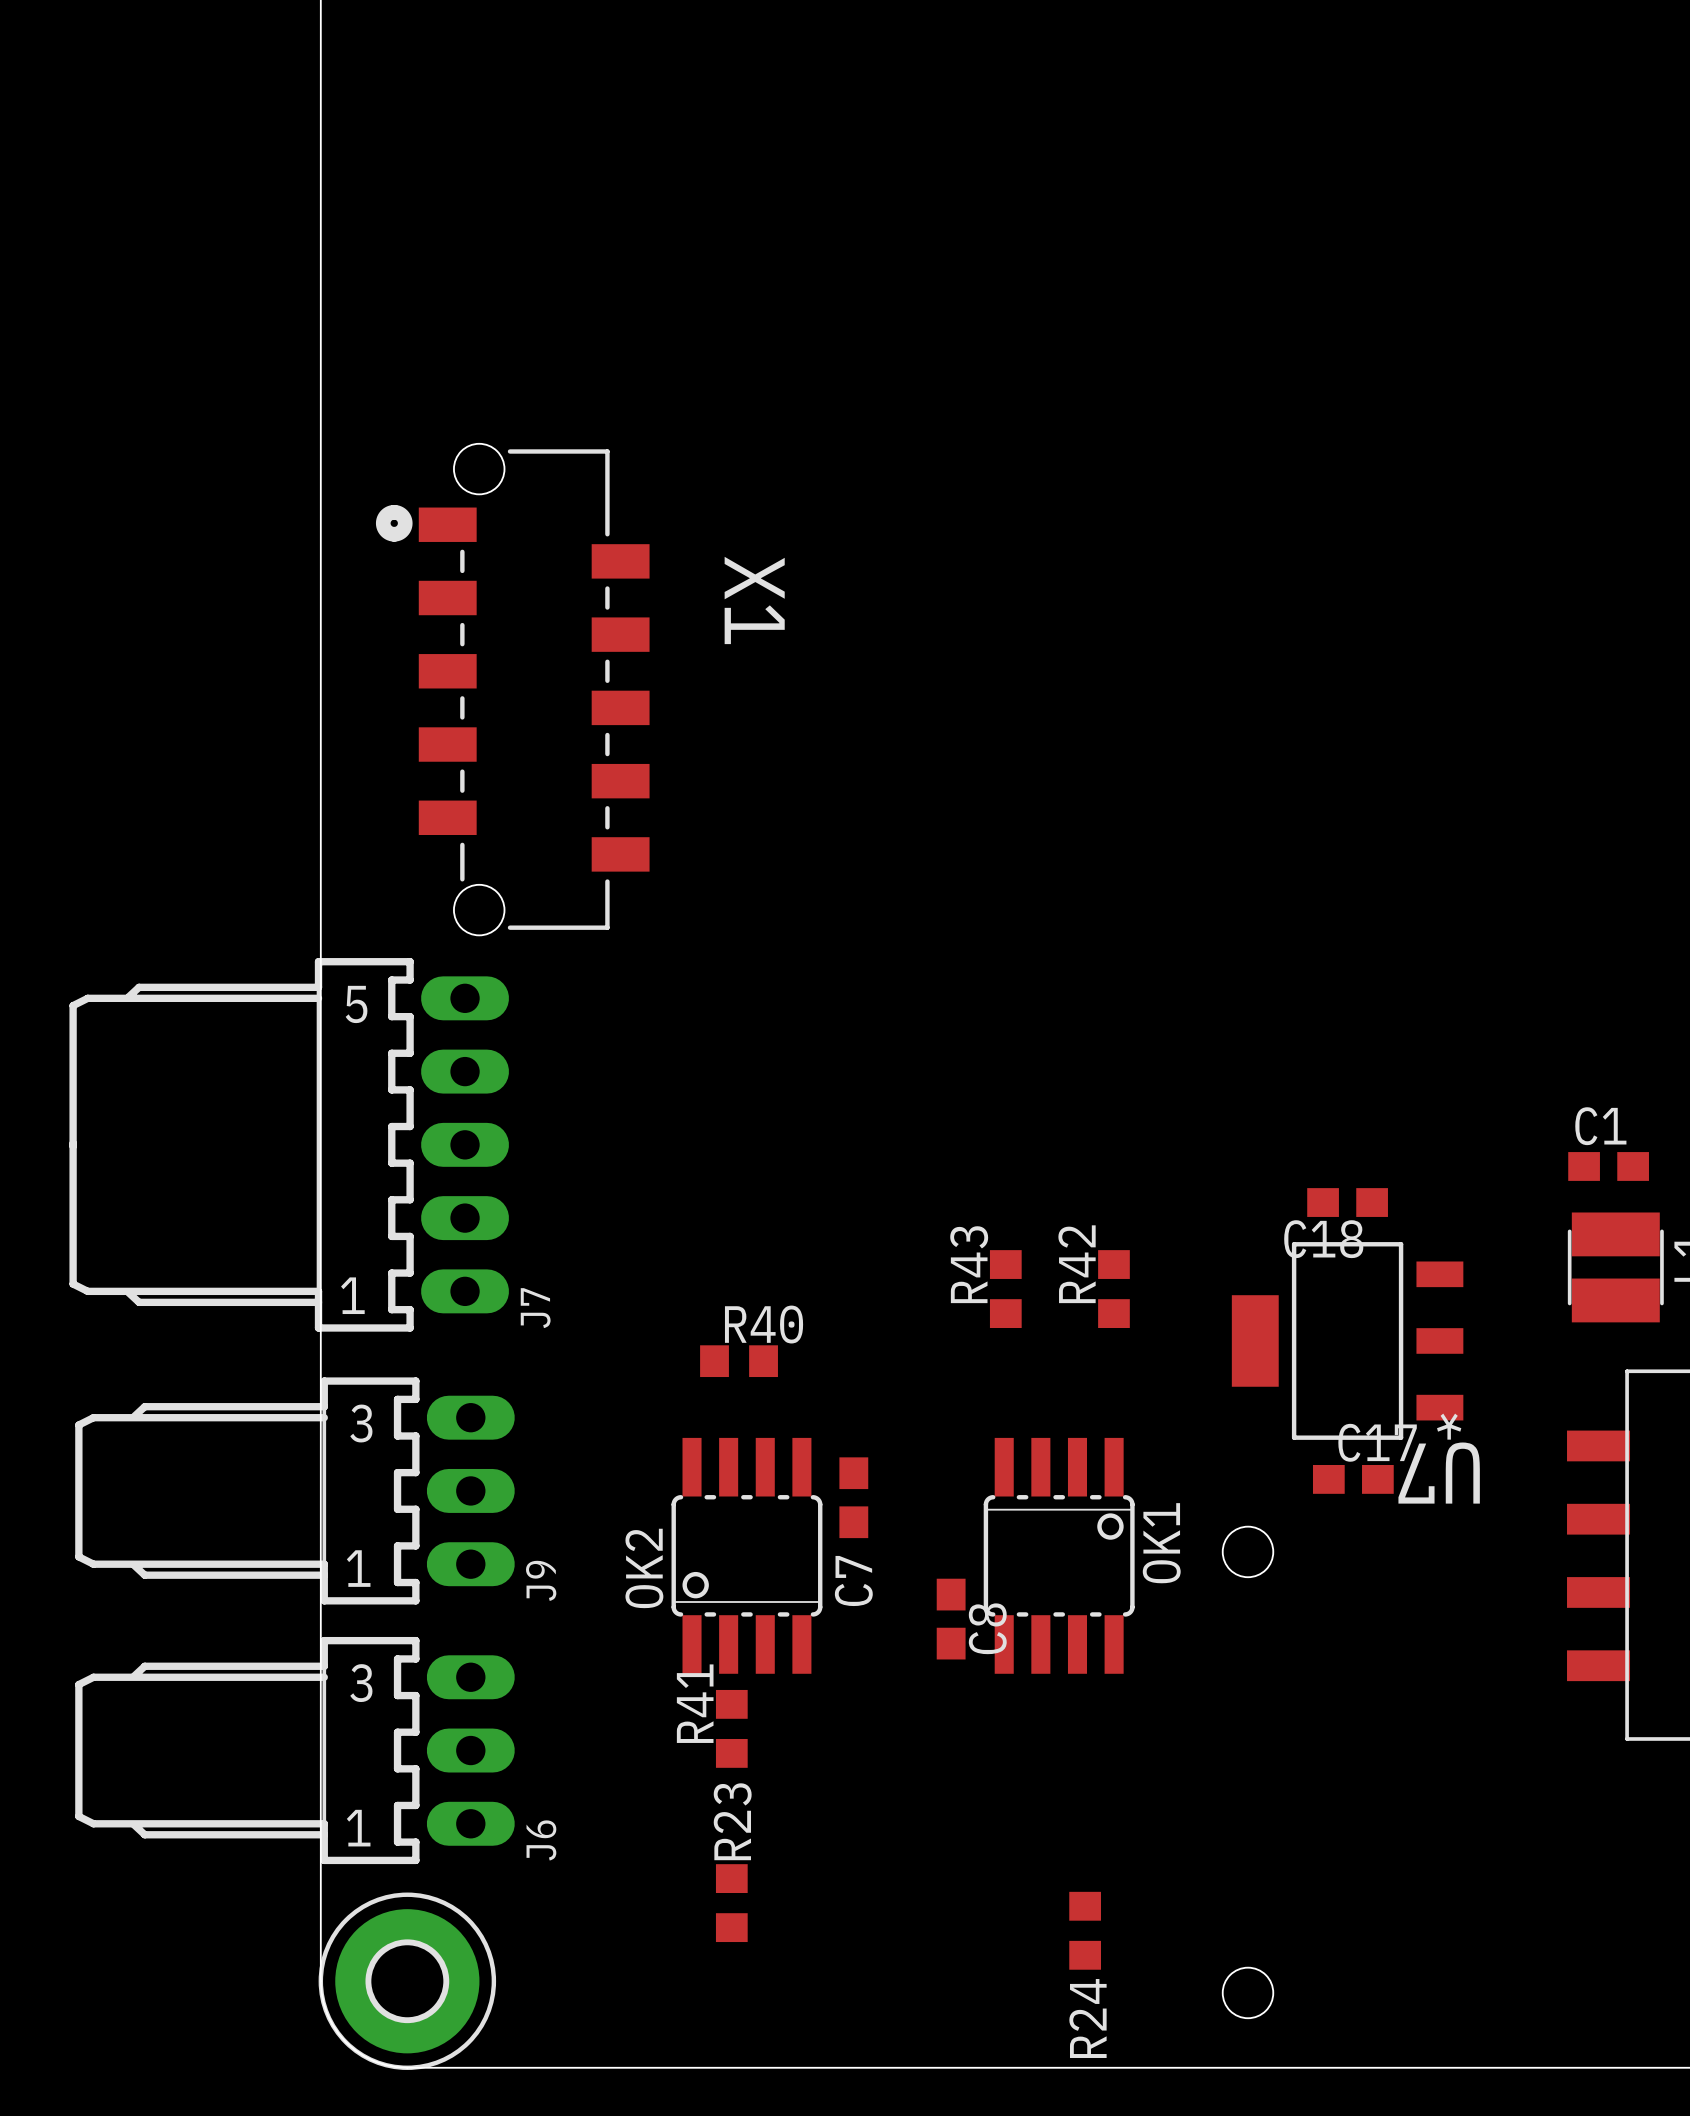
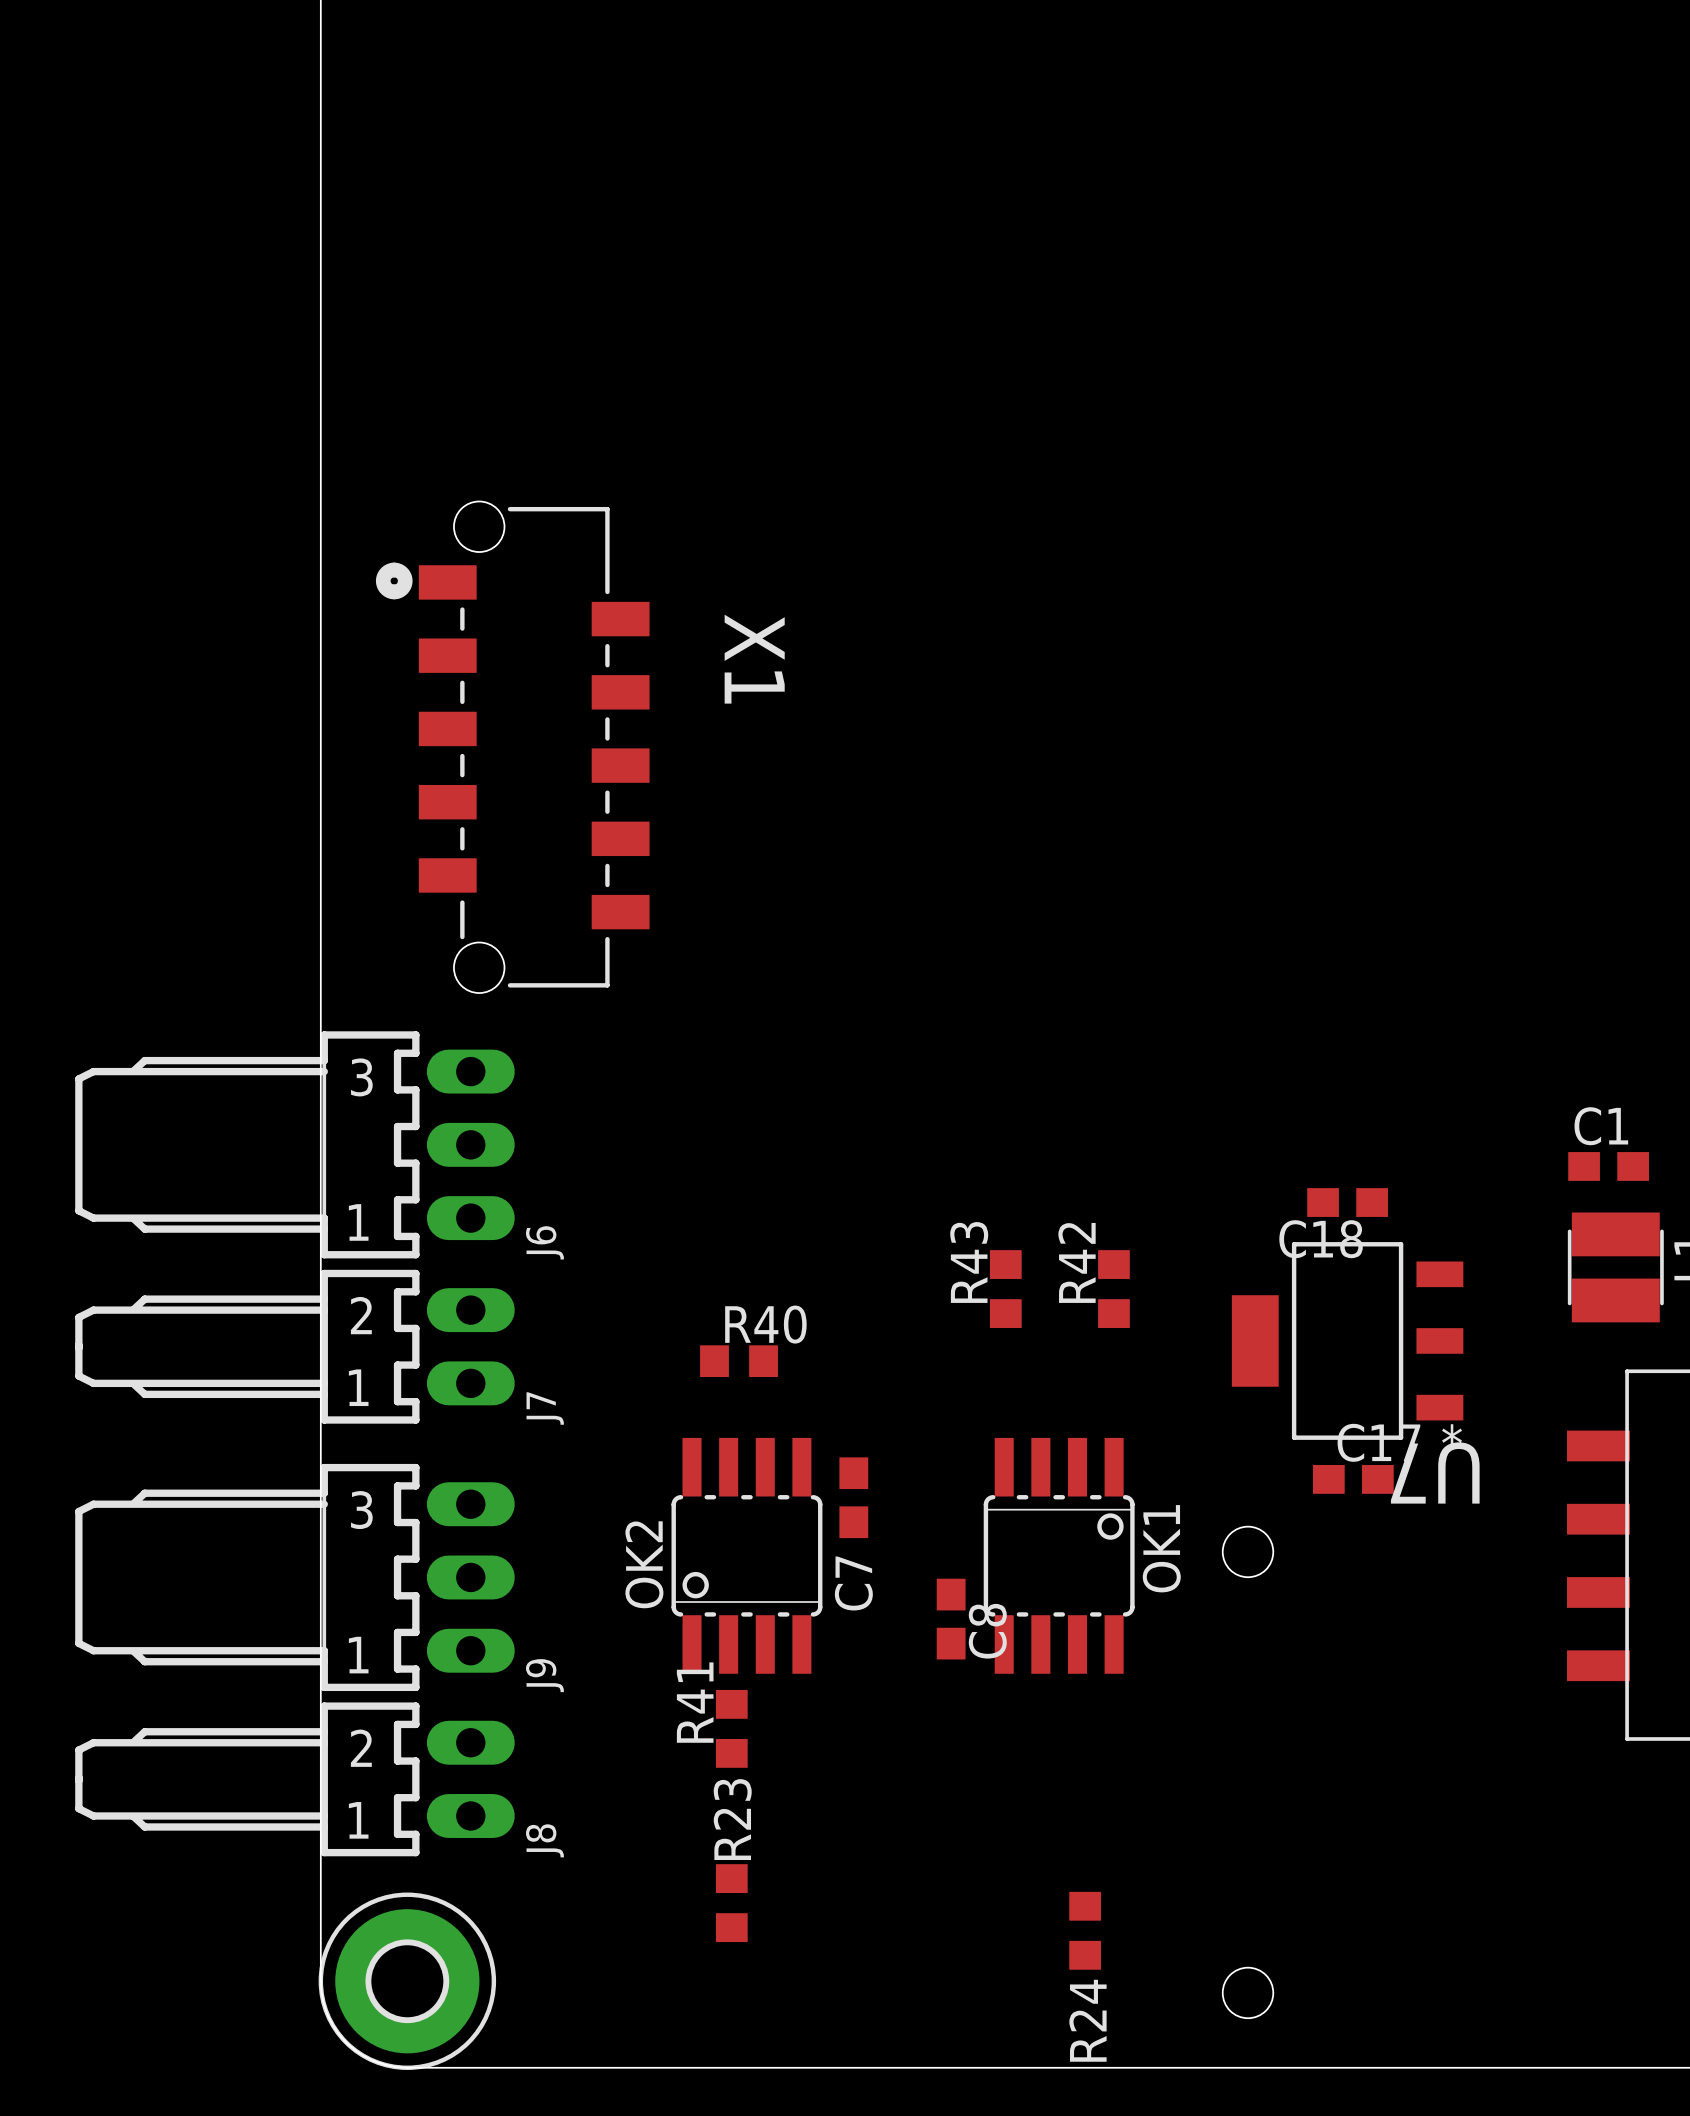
X1 position: (512, 689) -> (512, 747)
J7 footprint: [69, 958, 509, 1332] -> [75, 1269, 515, 1424]
J7 name position: J7 (535, 1308) -> J7 (545, 1408)
J9 position: (294, 1490) -> (294, 1577)
J6 position: (294, 1750) -> (294, 1144)
J8: none -> (294, 1779)

